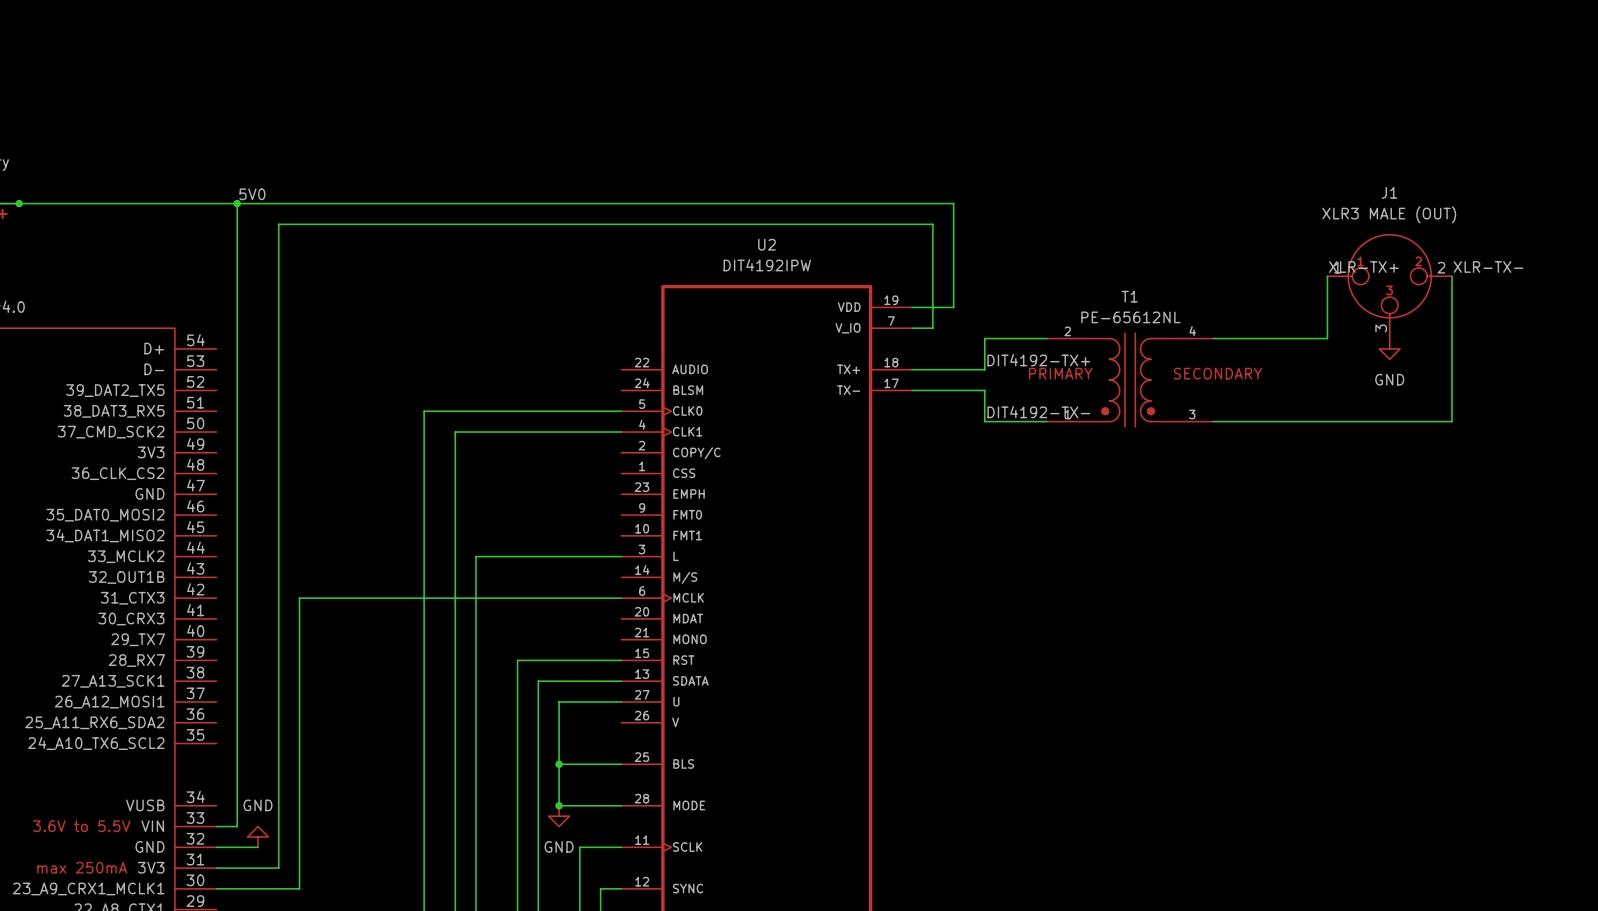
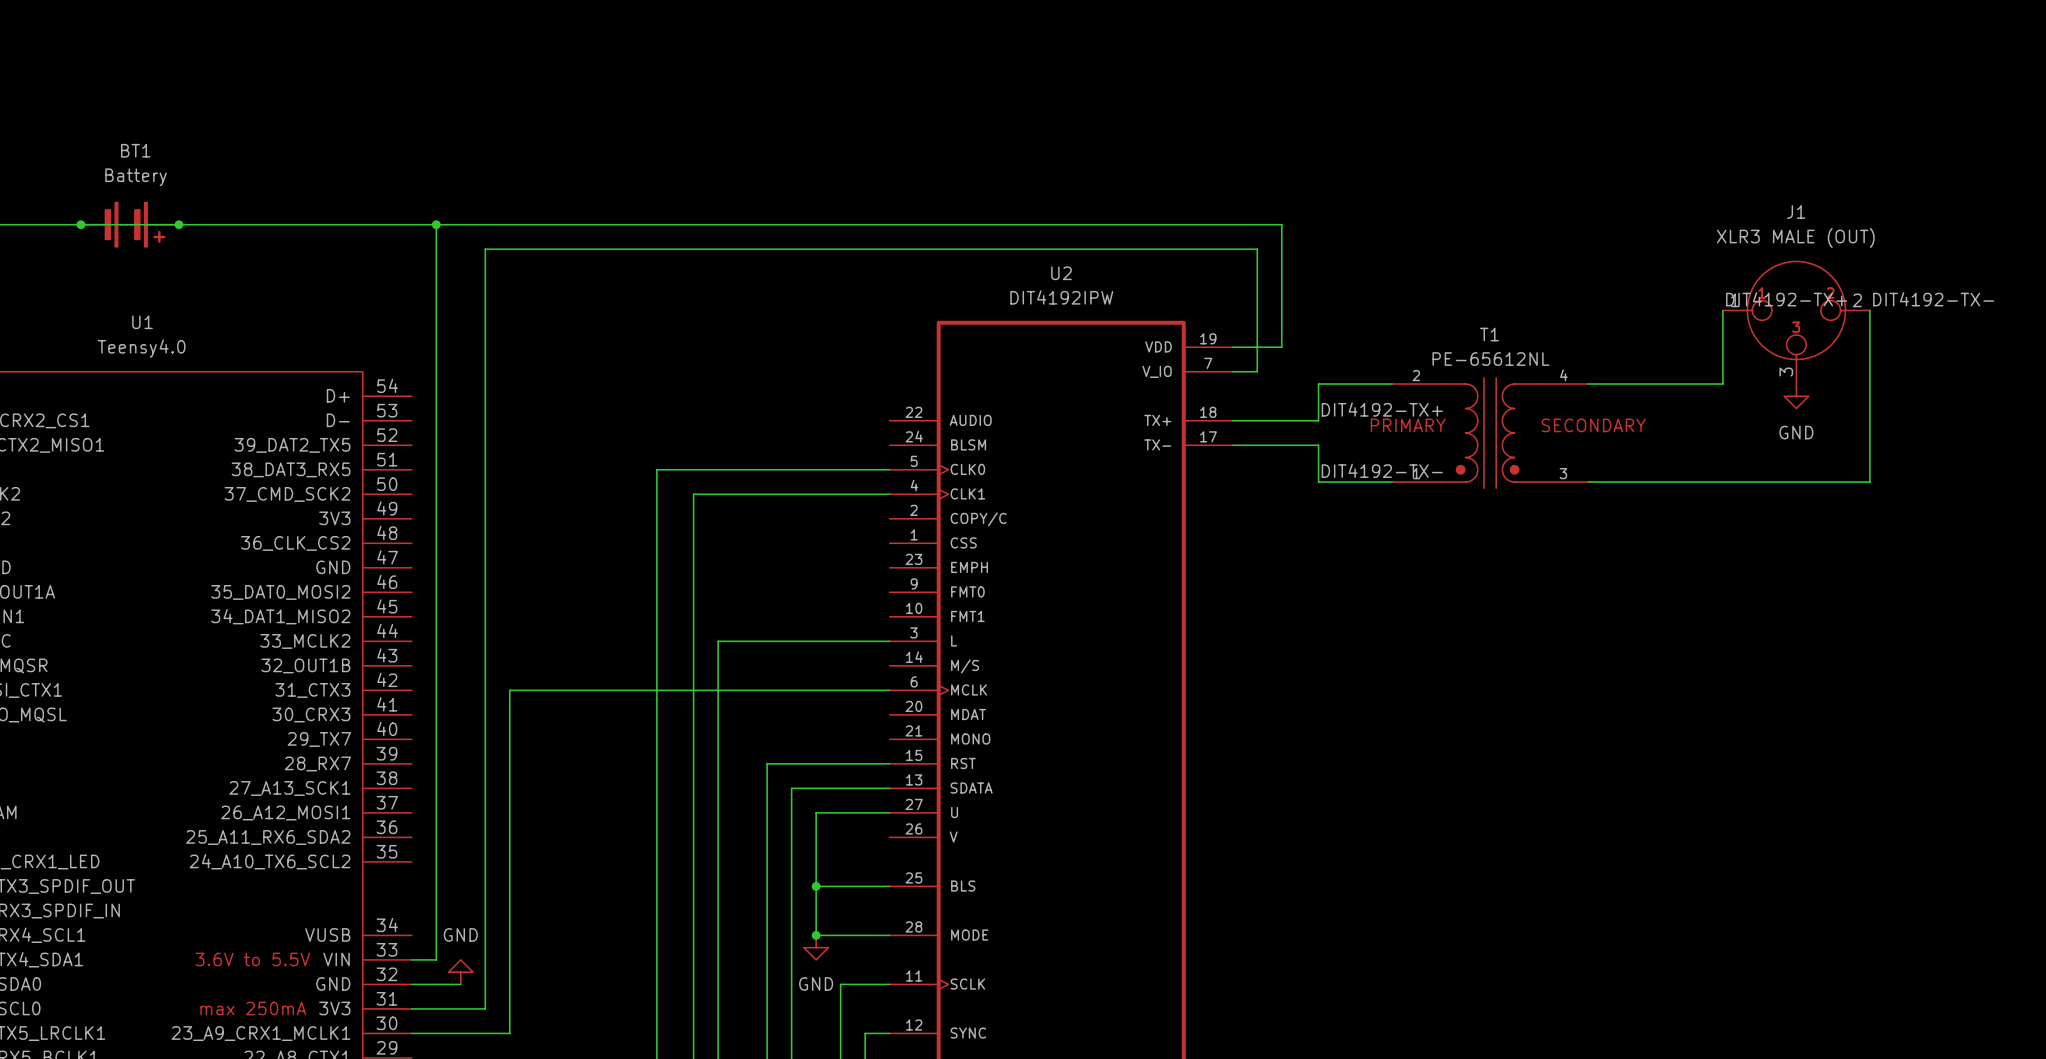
label: 5V0 (252, 194) -> none
label: XLR-TX+ (1363, 267) -> DIT4192-TX+ (1786, 299)
label: XLR-TX- (1488, 267) -> DIT4192-TX- (1933, 299)

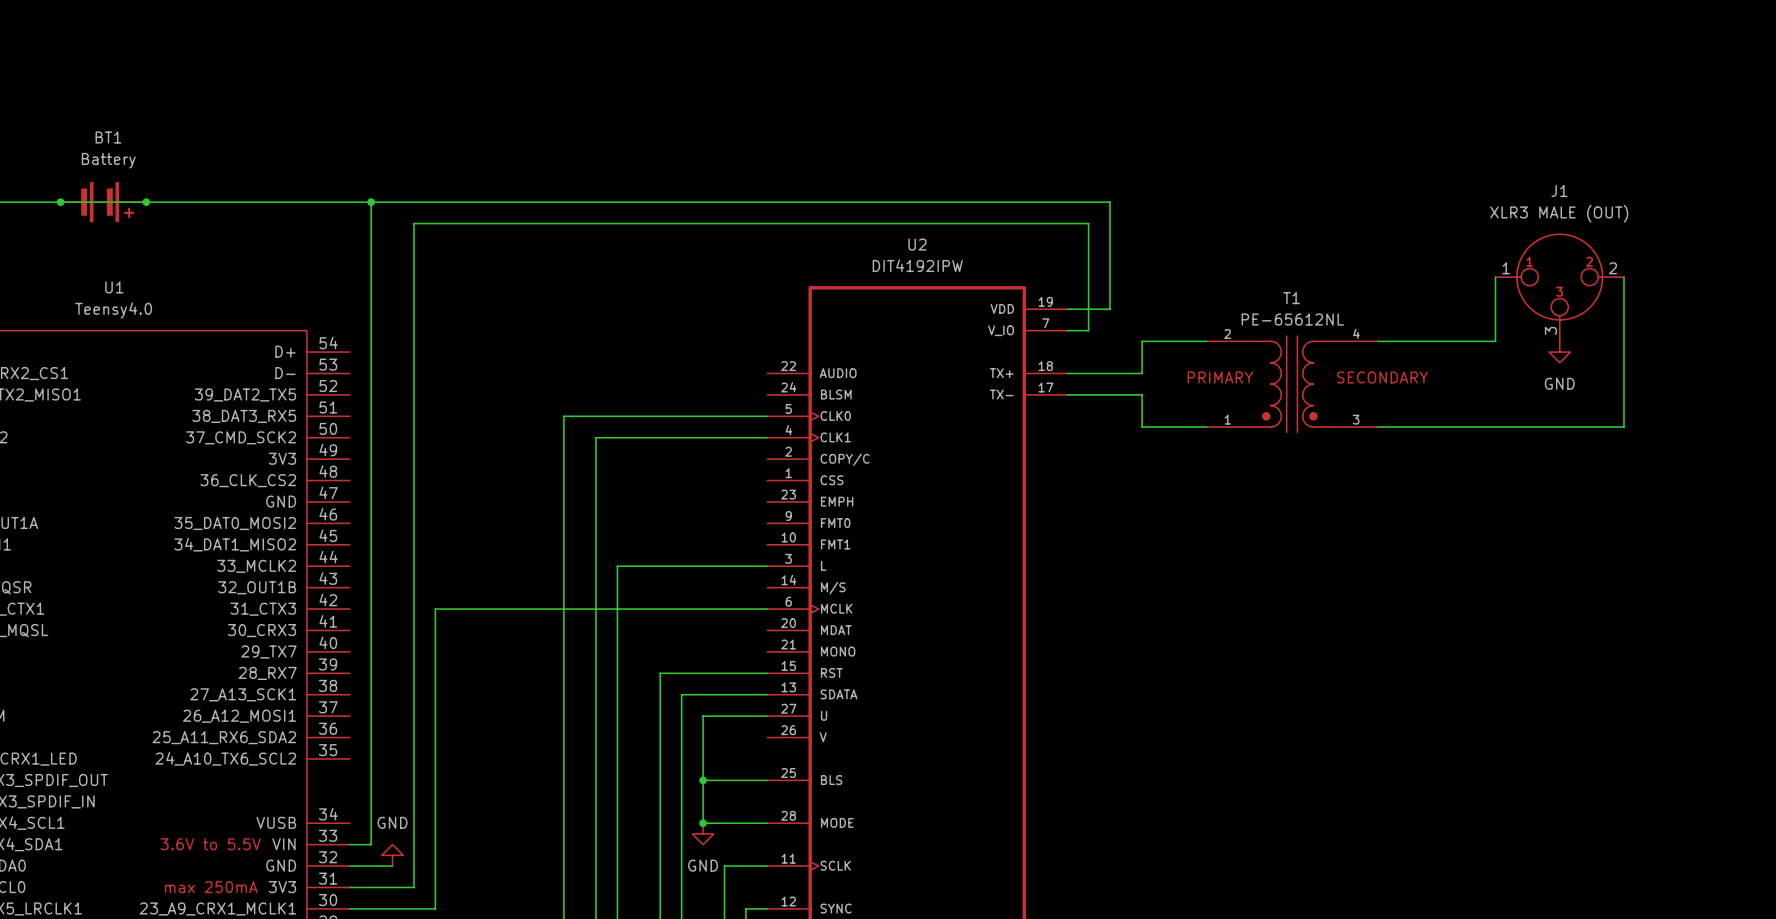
label: DIT4192-TX+ (1786, 299) -> none
label: DIT4192-TX- (1933, 299) -> none
label: DIT4192-TX+ (1382, 409) -> none
label: DIT4192-TX- (1382, 470) -> none

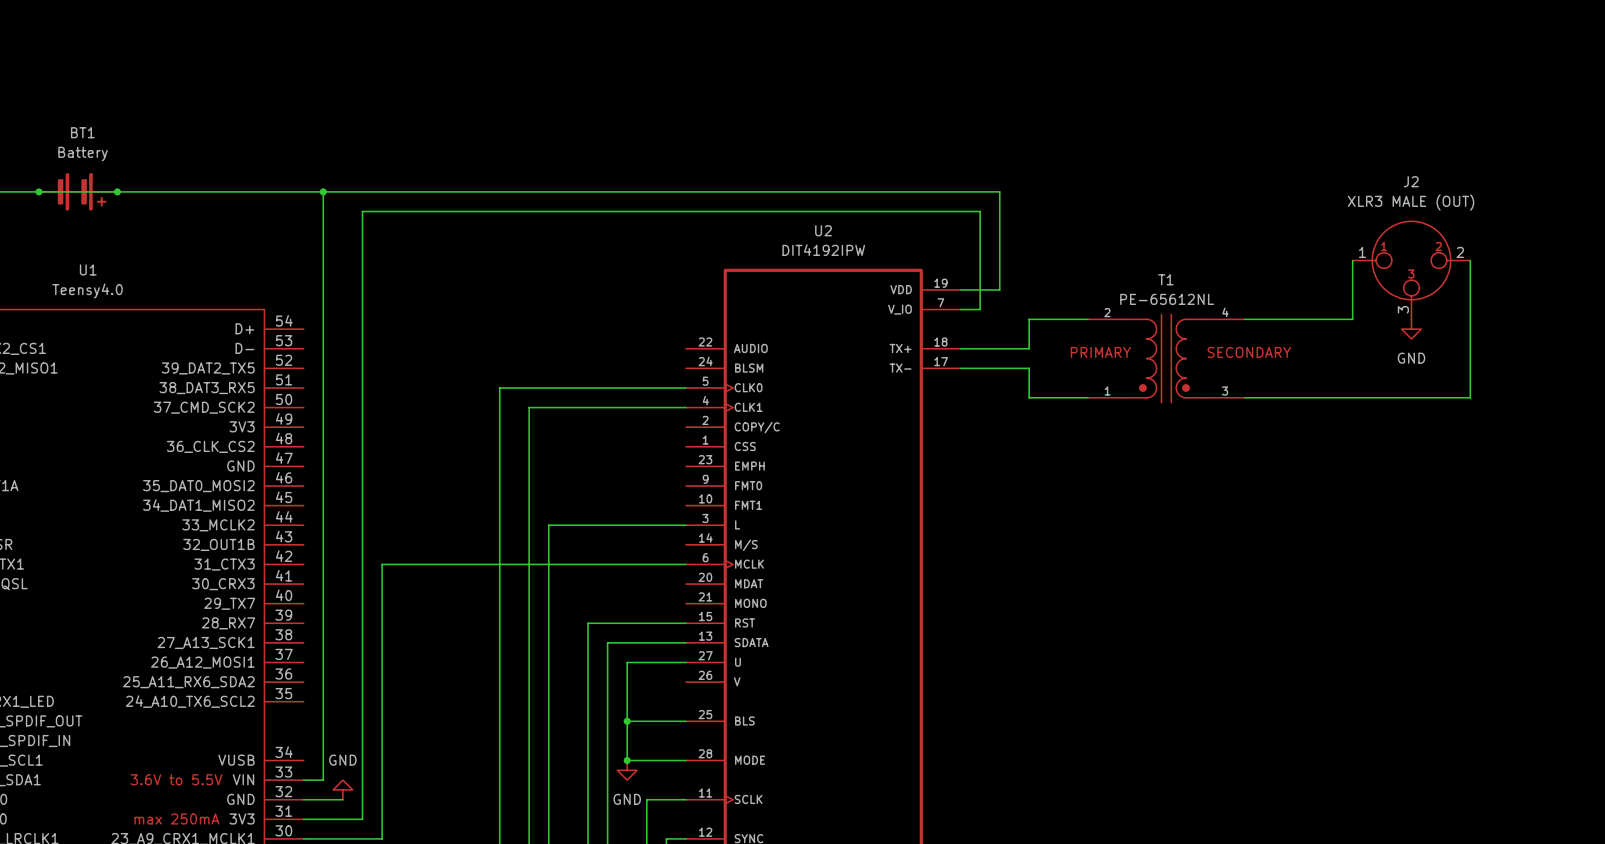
J1 name: J1 (1559, 191) -> J2 (1411, 181)

